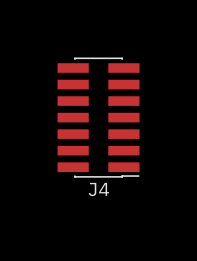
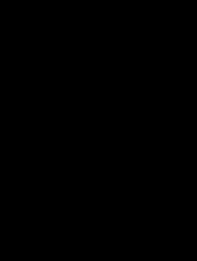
J4: (98, 117) -> none

